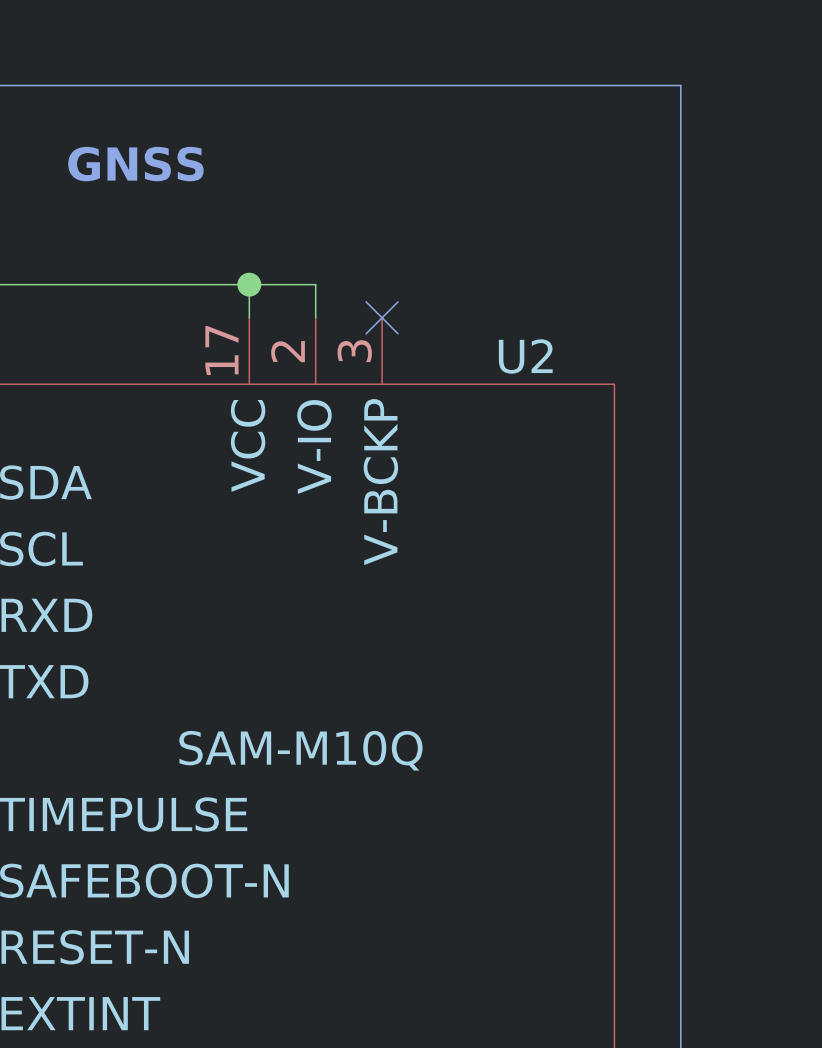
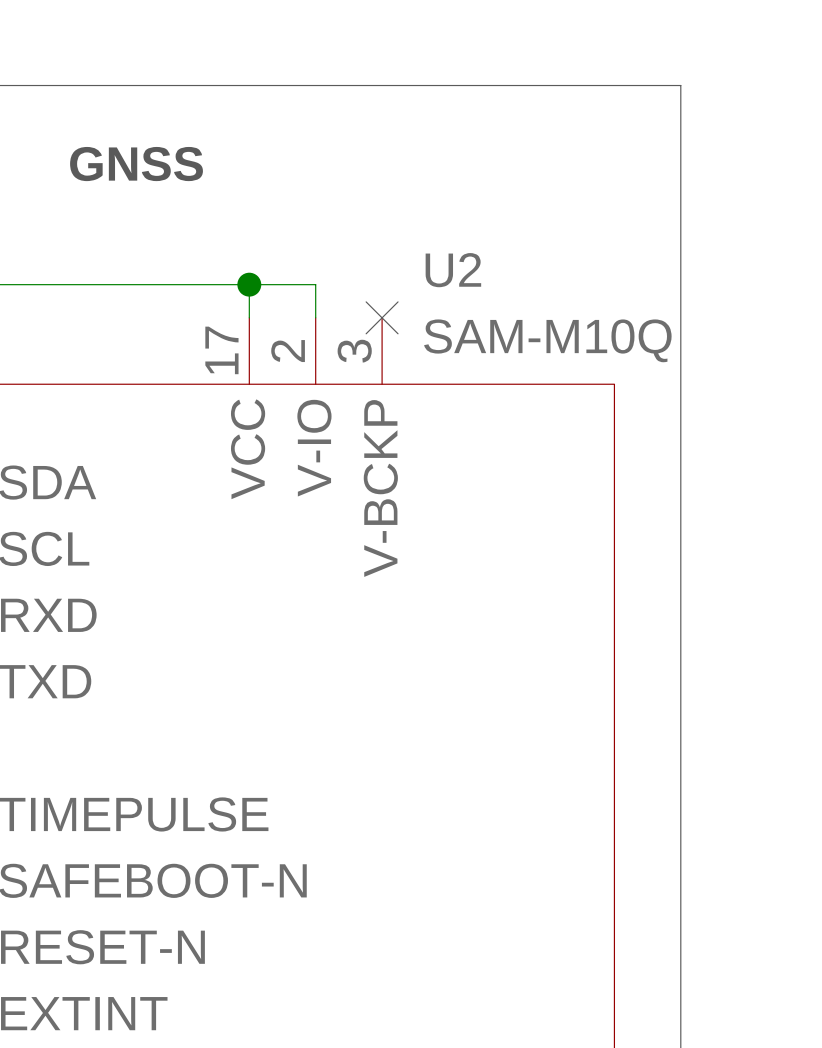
U2 name position: U2 (525, 356) -> U2 (453, 270)
U2 value position: SAM-M10Q (300, 750) -> SAM-M10Q (547, 340)

